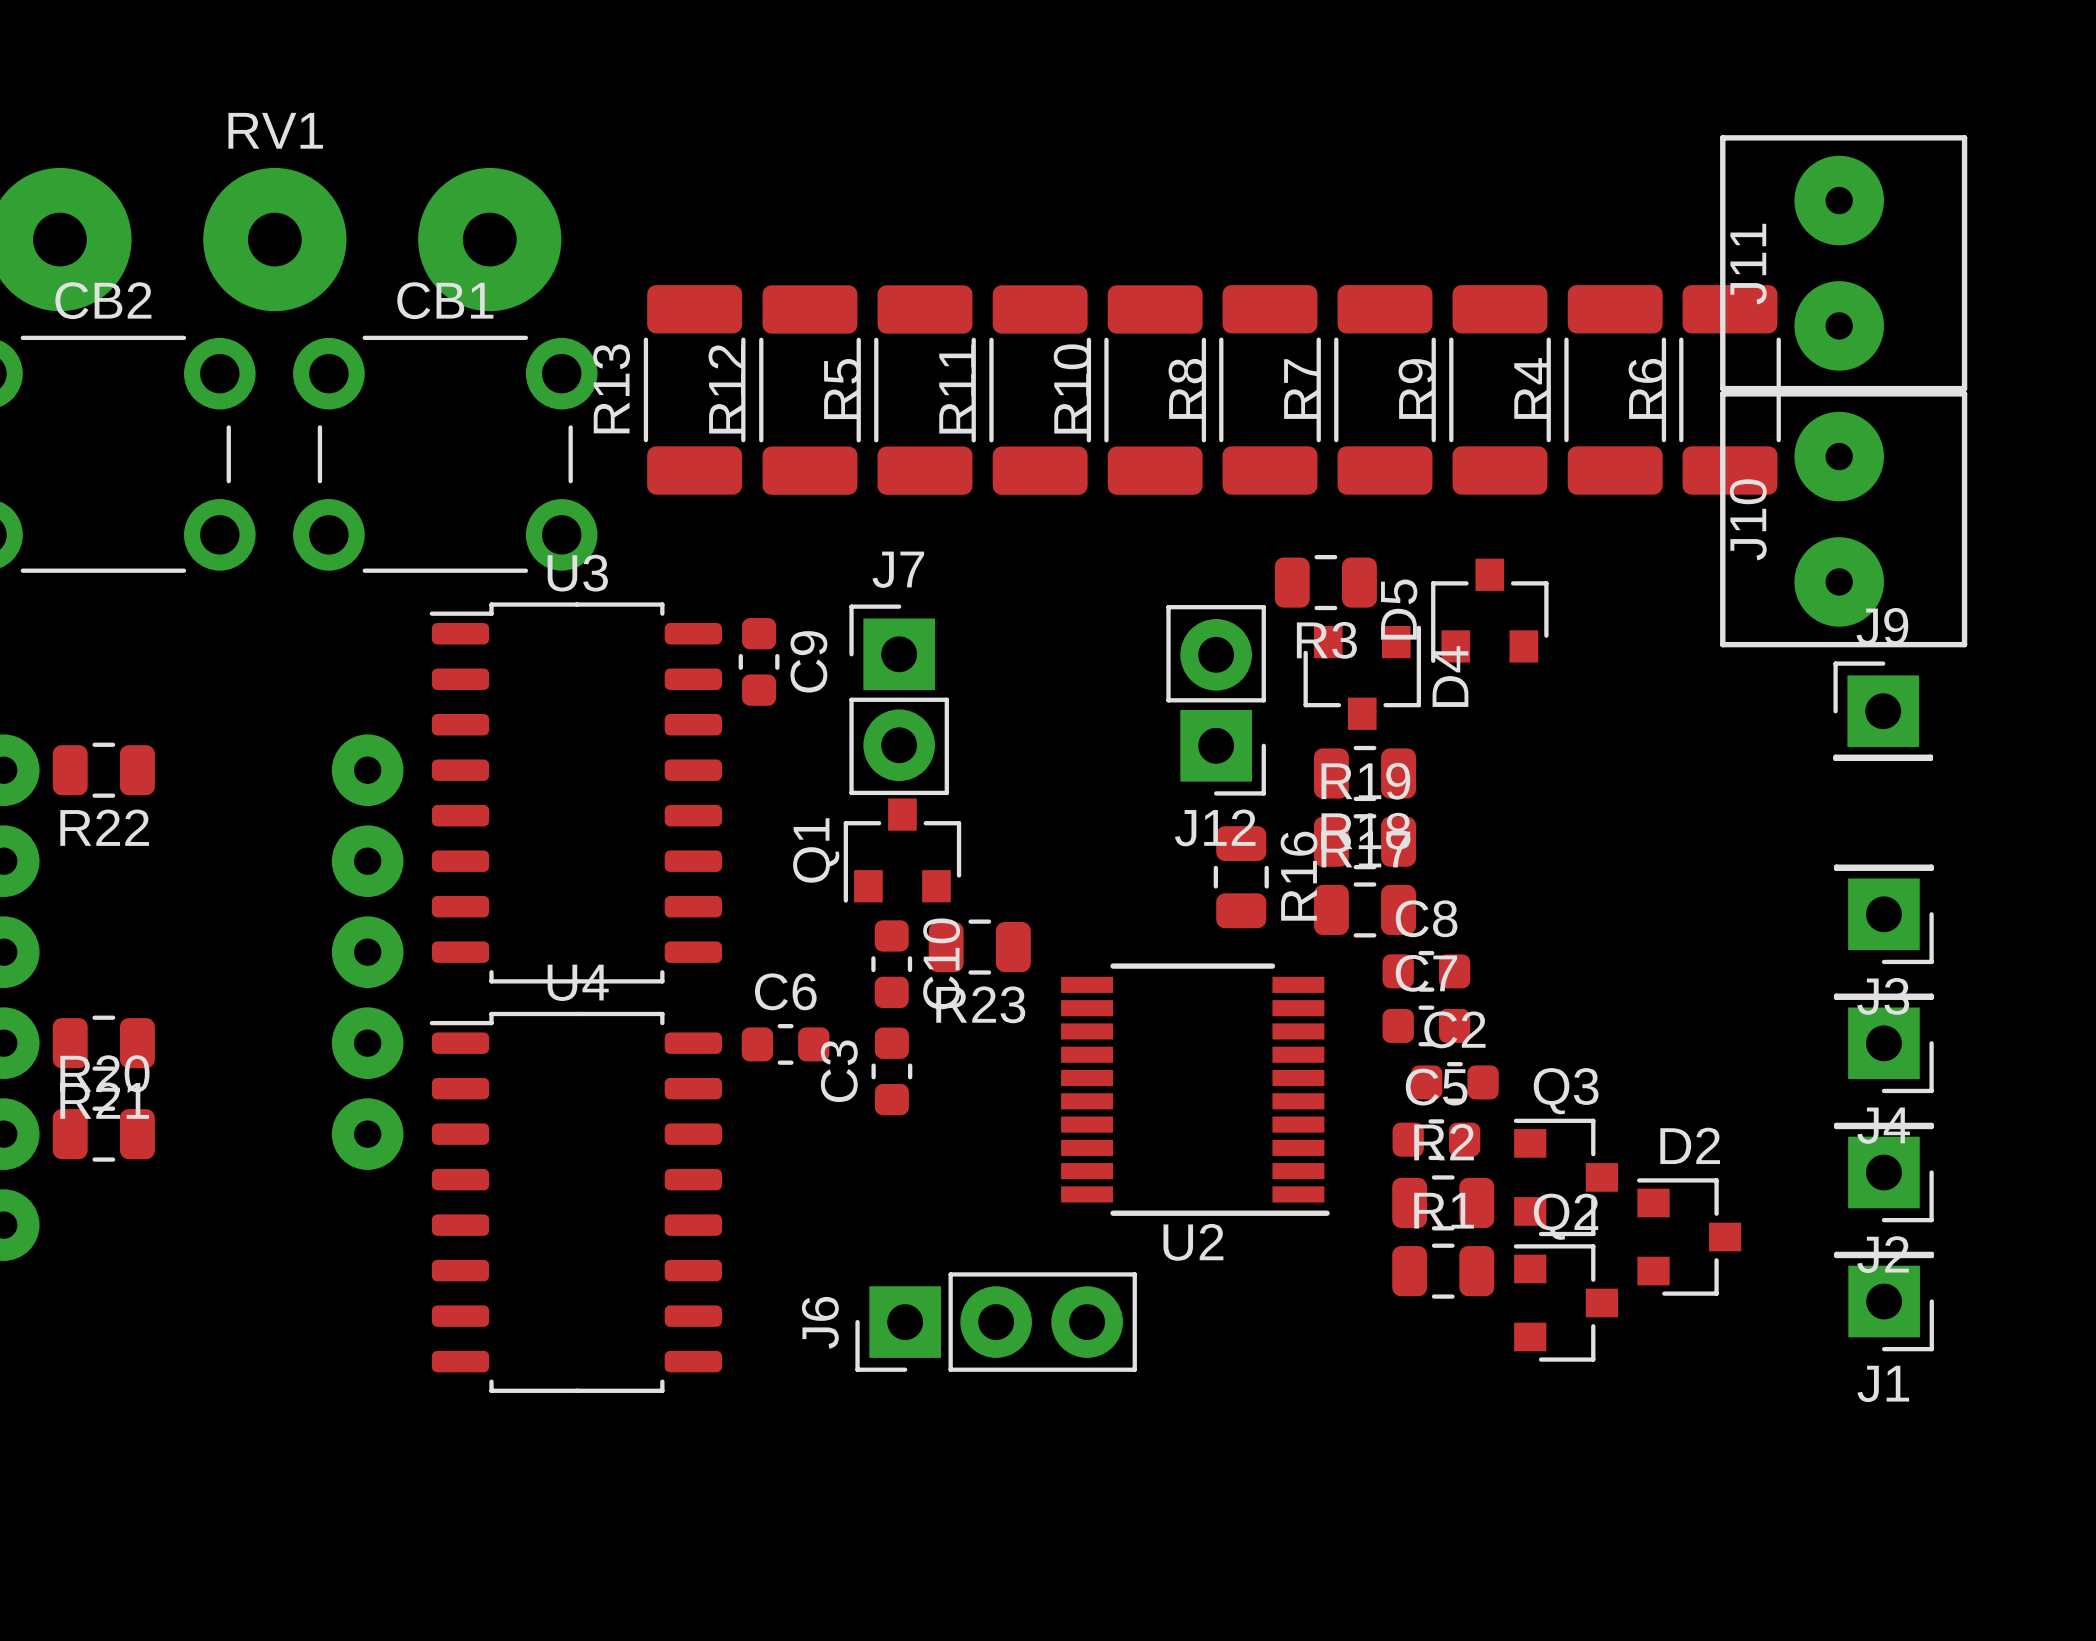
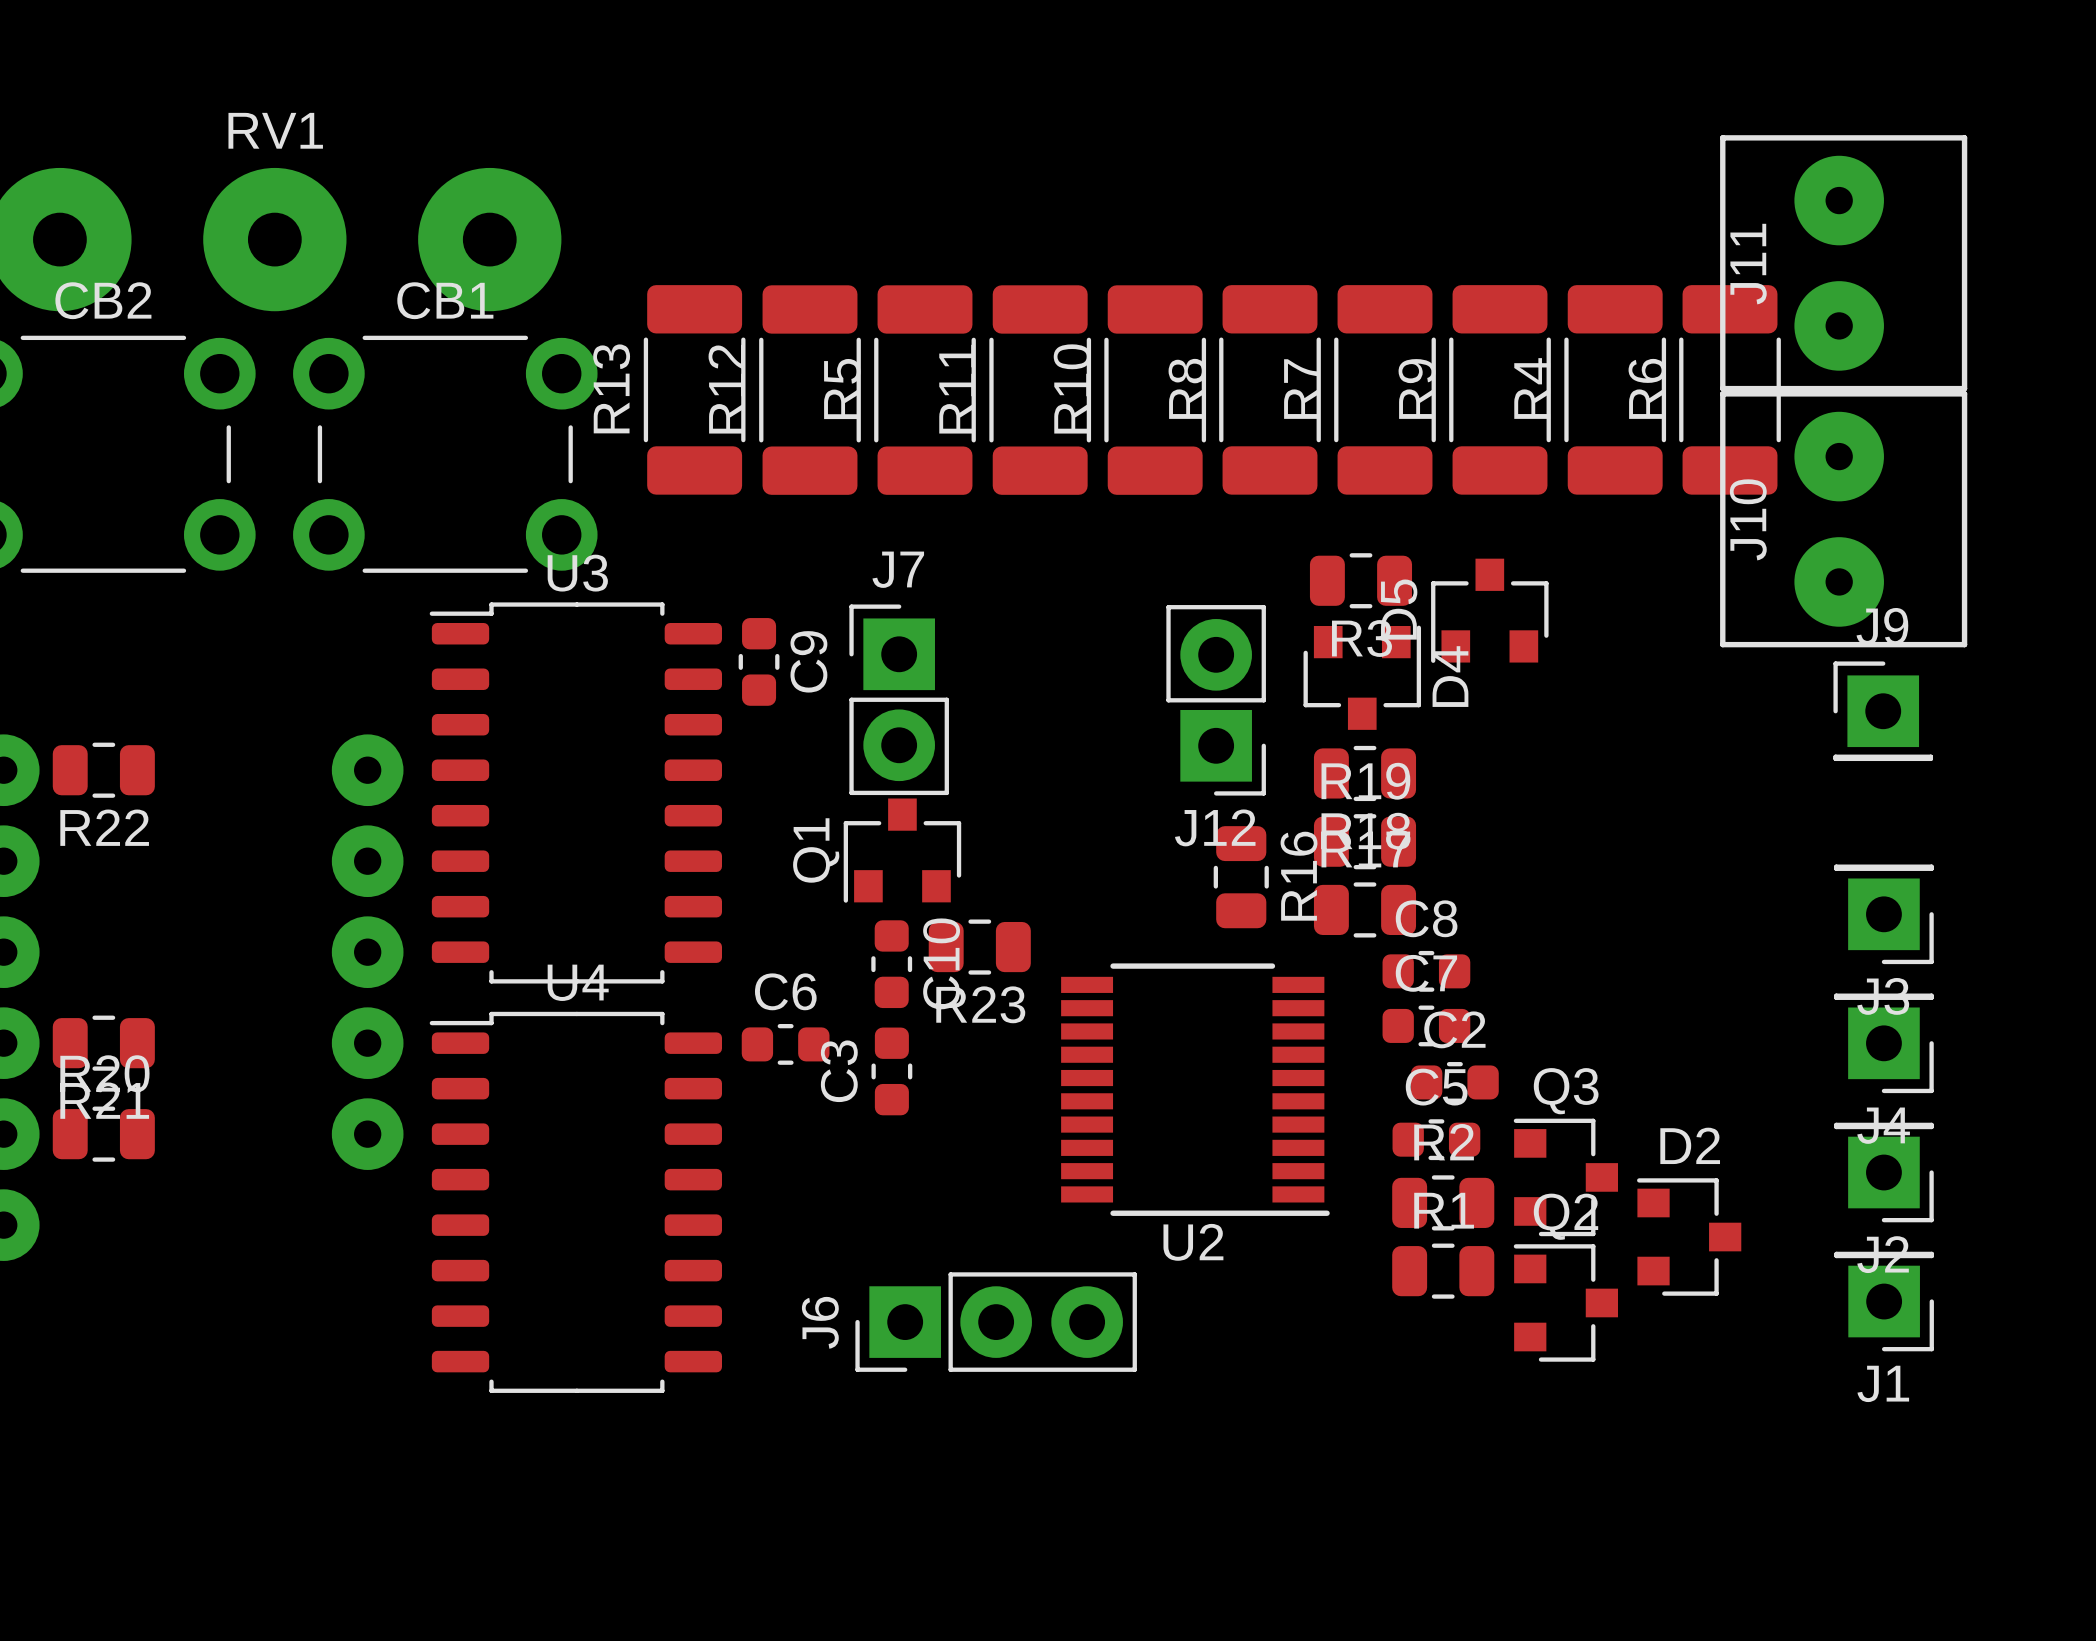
R3 position: (1325, 582) -> (1360, 580)

